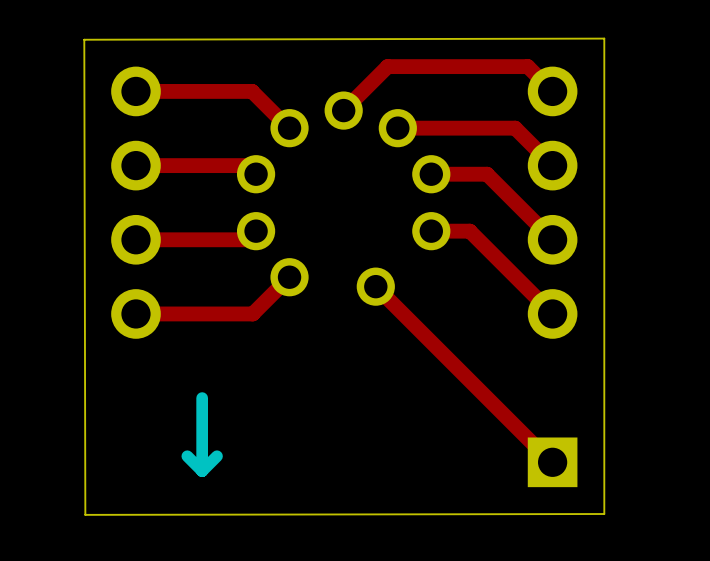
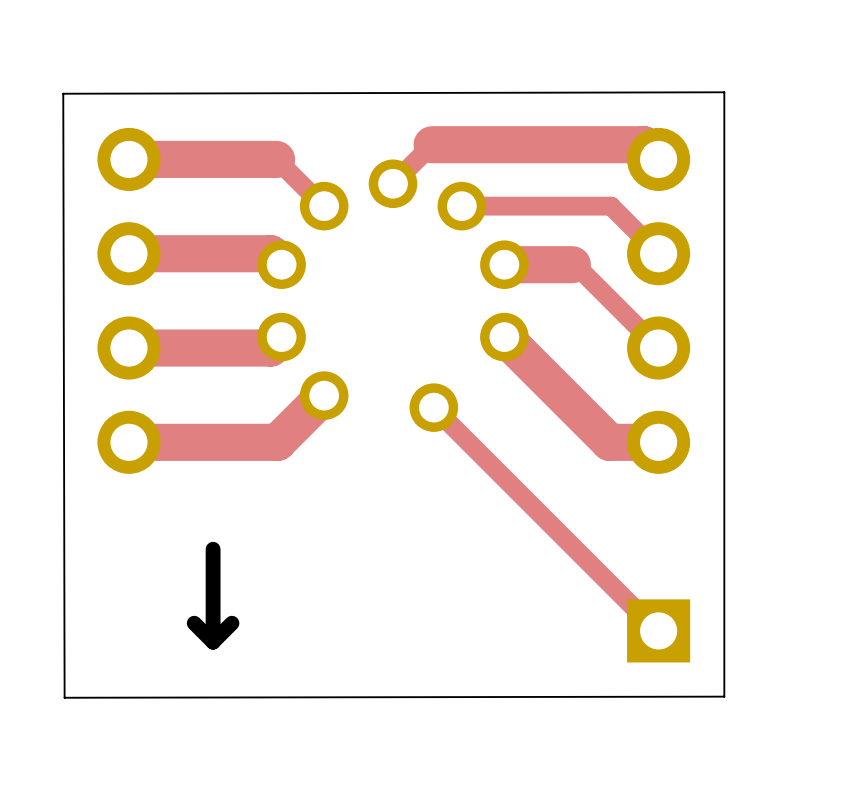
track: (374, 79) (387, 66) (527, 66) (541, 79) -> (432, 144) (643, 144)
track width: thin (135, 91) (252, 91) -> thick (128, 159) (276, 159)
track width: thin (135, 165) (247, 165) (256, 174) -> thick (128, 253) (270, 253) (281, 264)
track width: thin (431, 174) (484, 174) -> thick (504, 264) (572, 264)
track width: thin (256, 231) (247, 239) (135, 239) -> thick (281, 337) (270, 348) (128, 348)
track: (431, 231) (469, 231) (552, 313) -> (504, 337) (609, 442) (658, 442)
track width: thin (289, 277) (252, 313) (135, 313) -> thick (324, 395) (277, 442) (128, 442)

